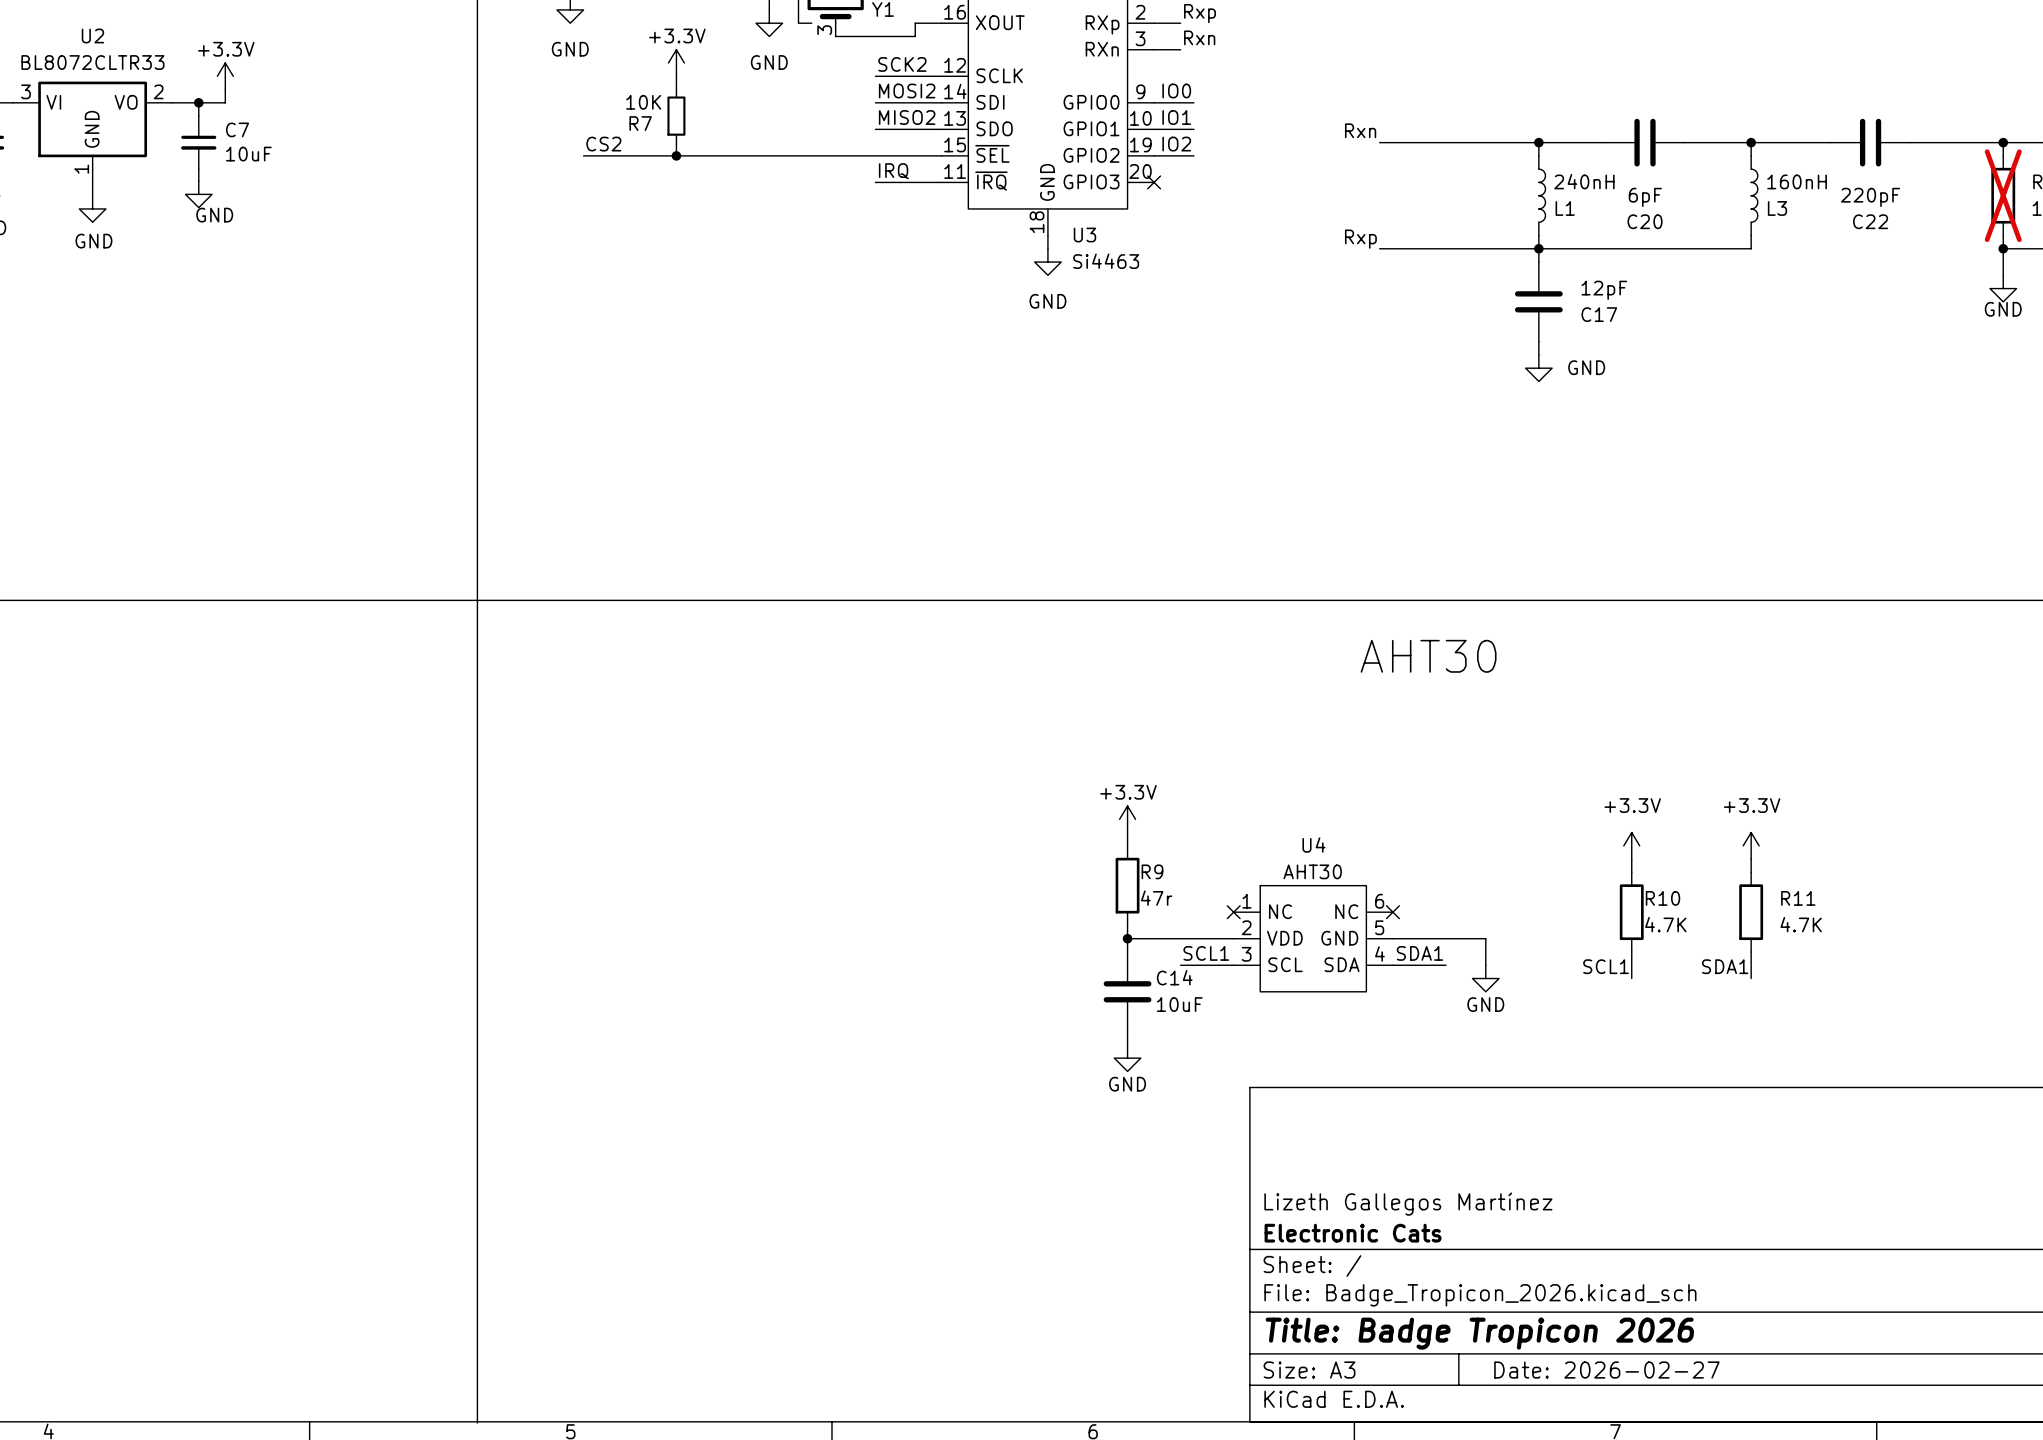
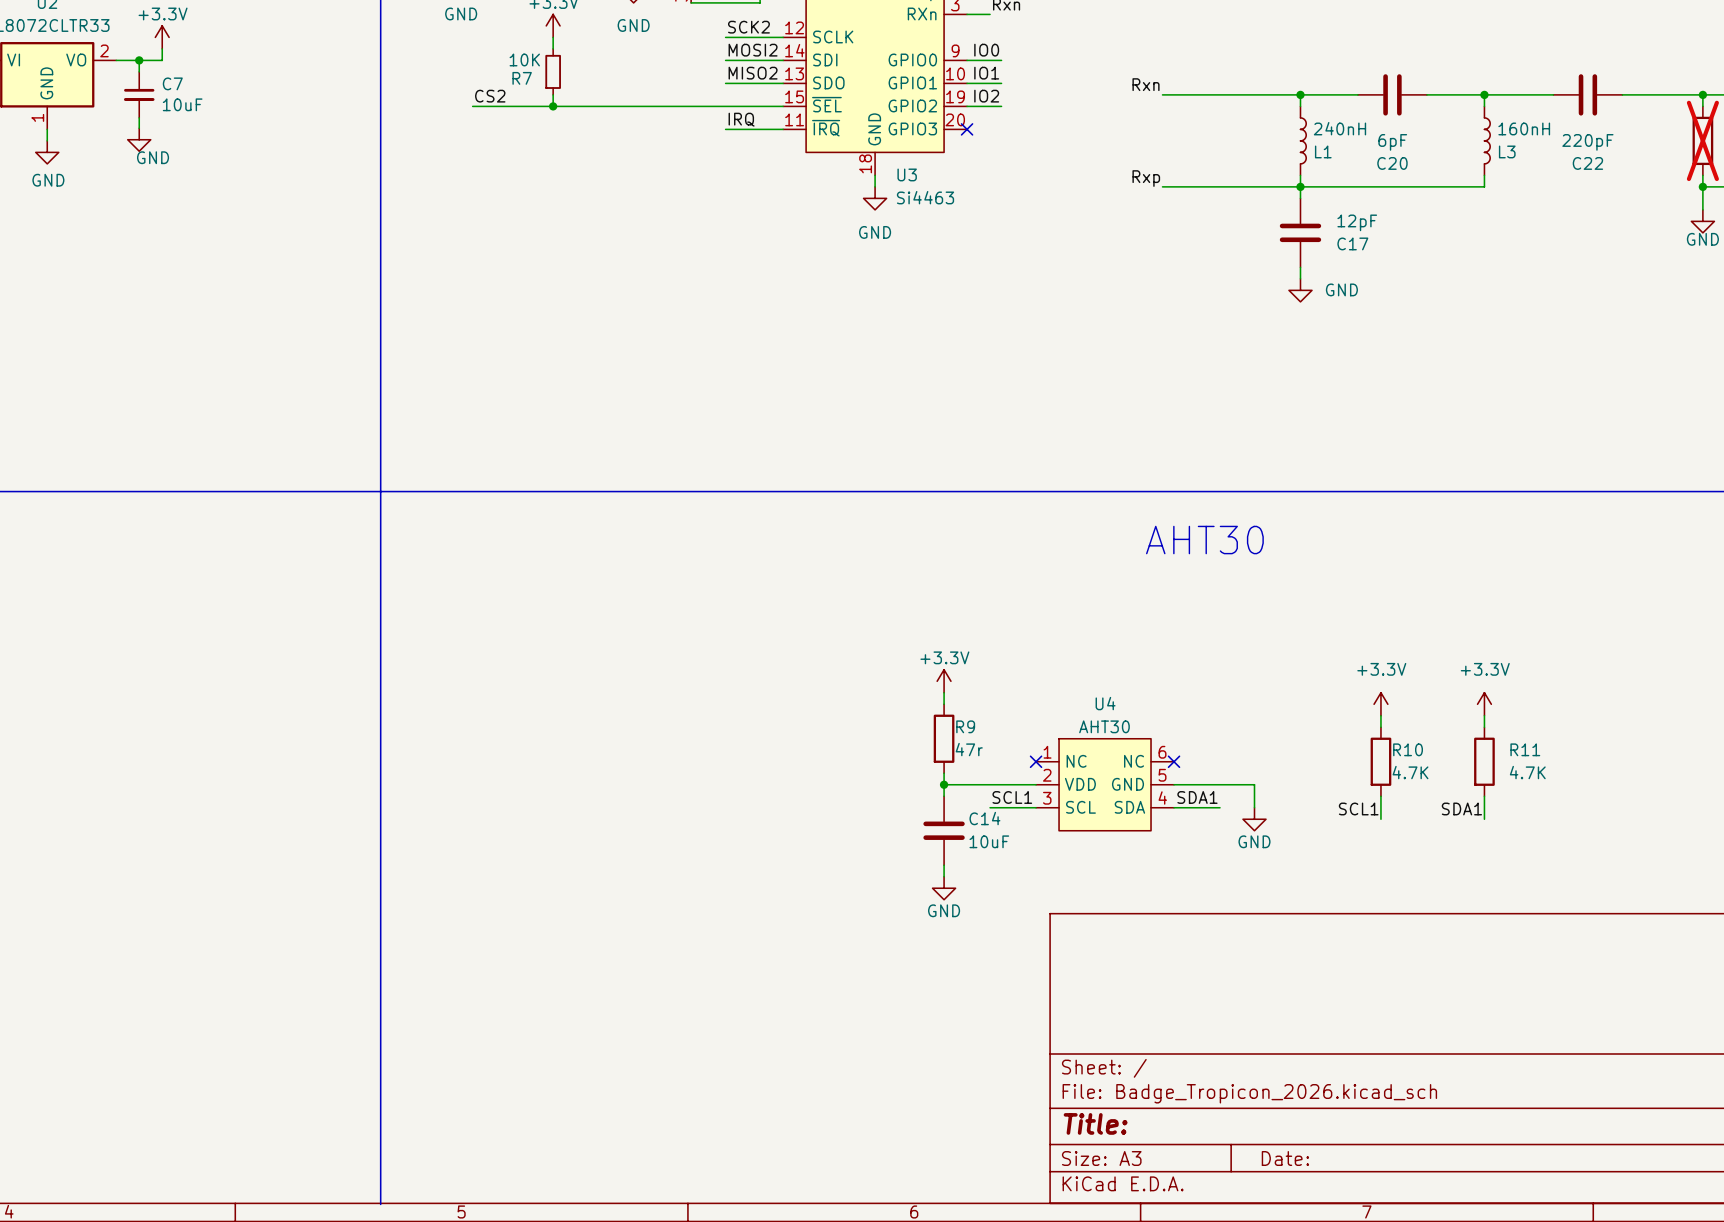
title block: Lizeth Gallegos Martínez (1408, 1204) -> none
title block: Electronic Cats (1353, 1233) -> none
title block: Title: Badge Tropicon 2026 (1479, 1333) -> Title: (1095, 1123)
title block: Date: 2026-02-27 (1606, 1370) -> Date: (1285, 1158)

